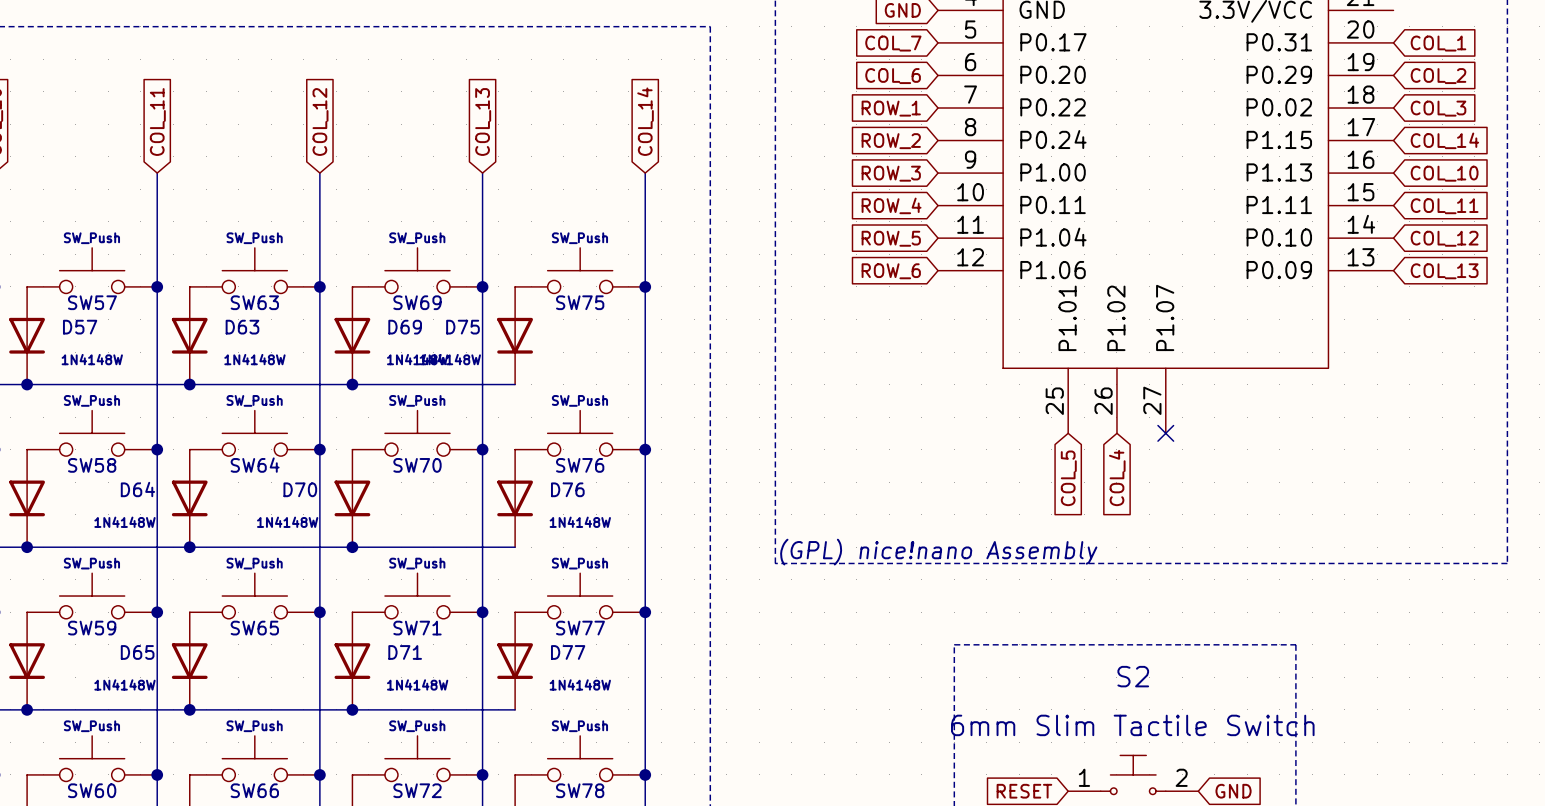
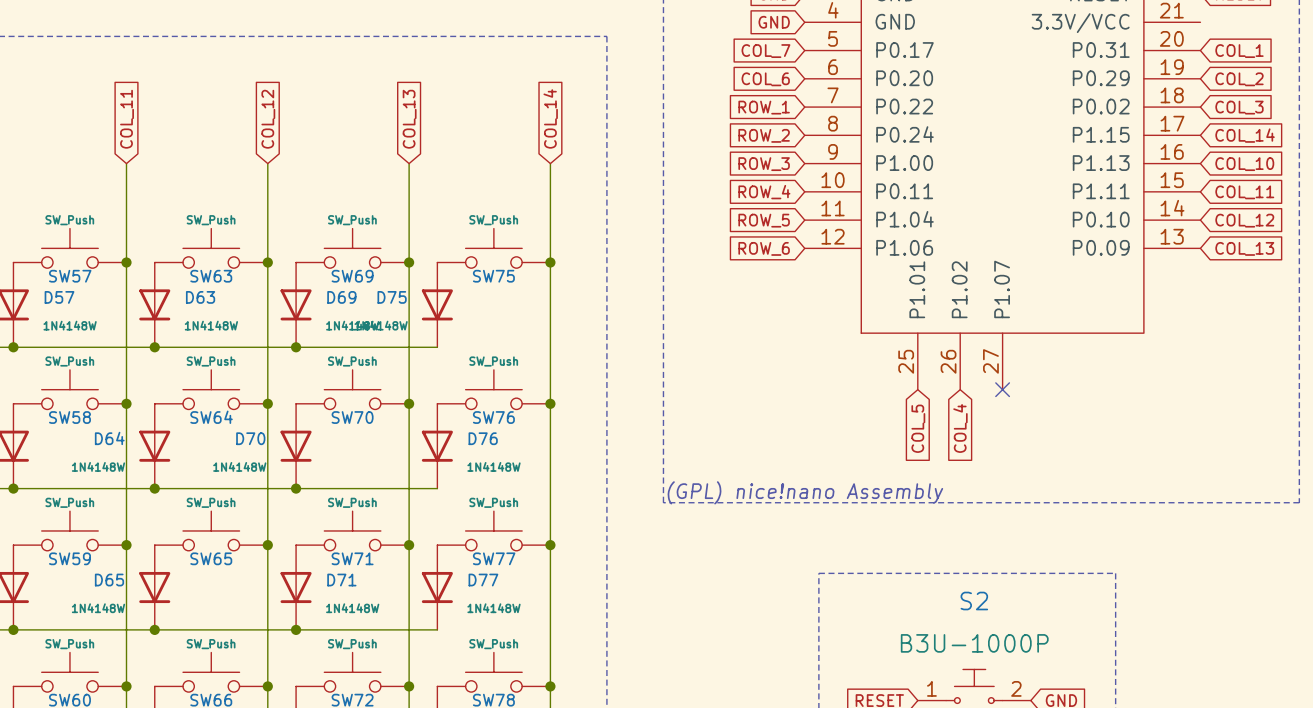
S2 value: 6mm Slim Tactile Switch (1132, 725) -> B3U-1000P (974, 643)

